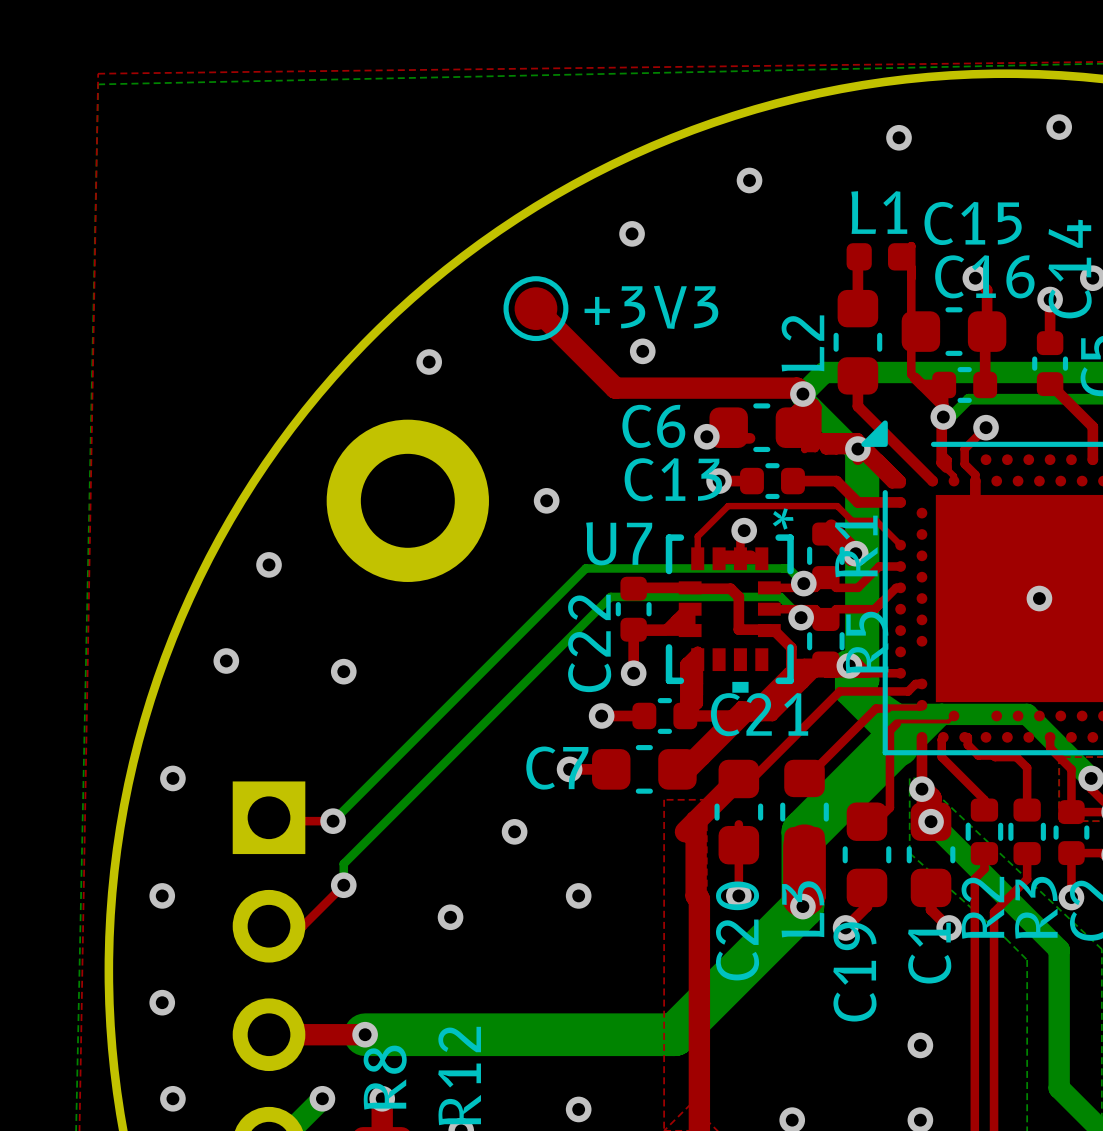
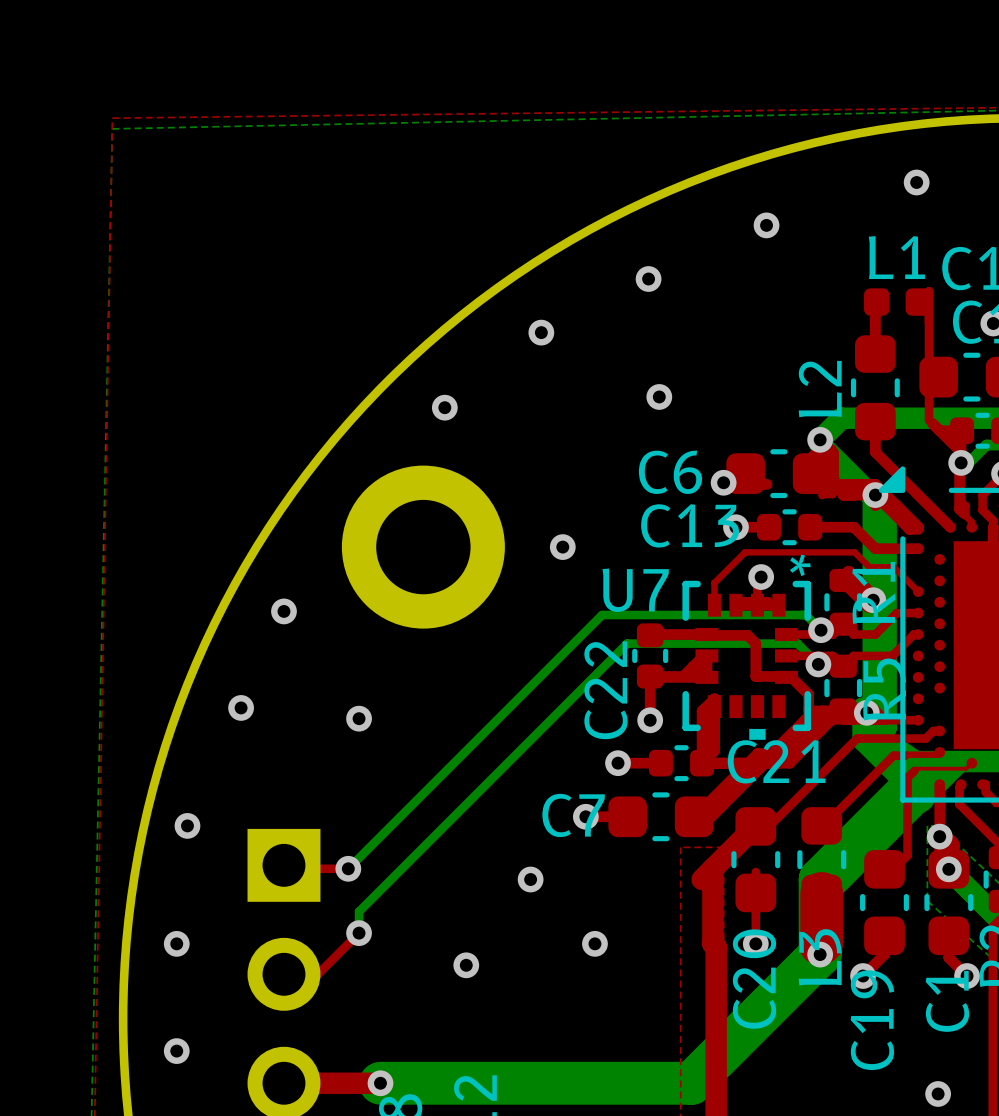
via: none -> (541, 332)
top track: (535, 308) (615, 388) (796, 388) (802, 394) -> none
+3V3: (535, 308) -> none

